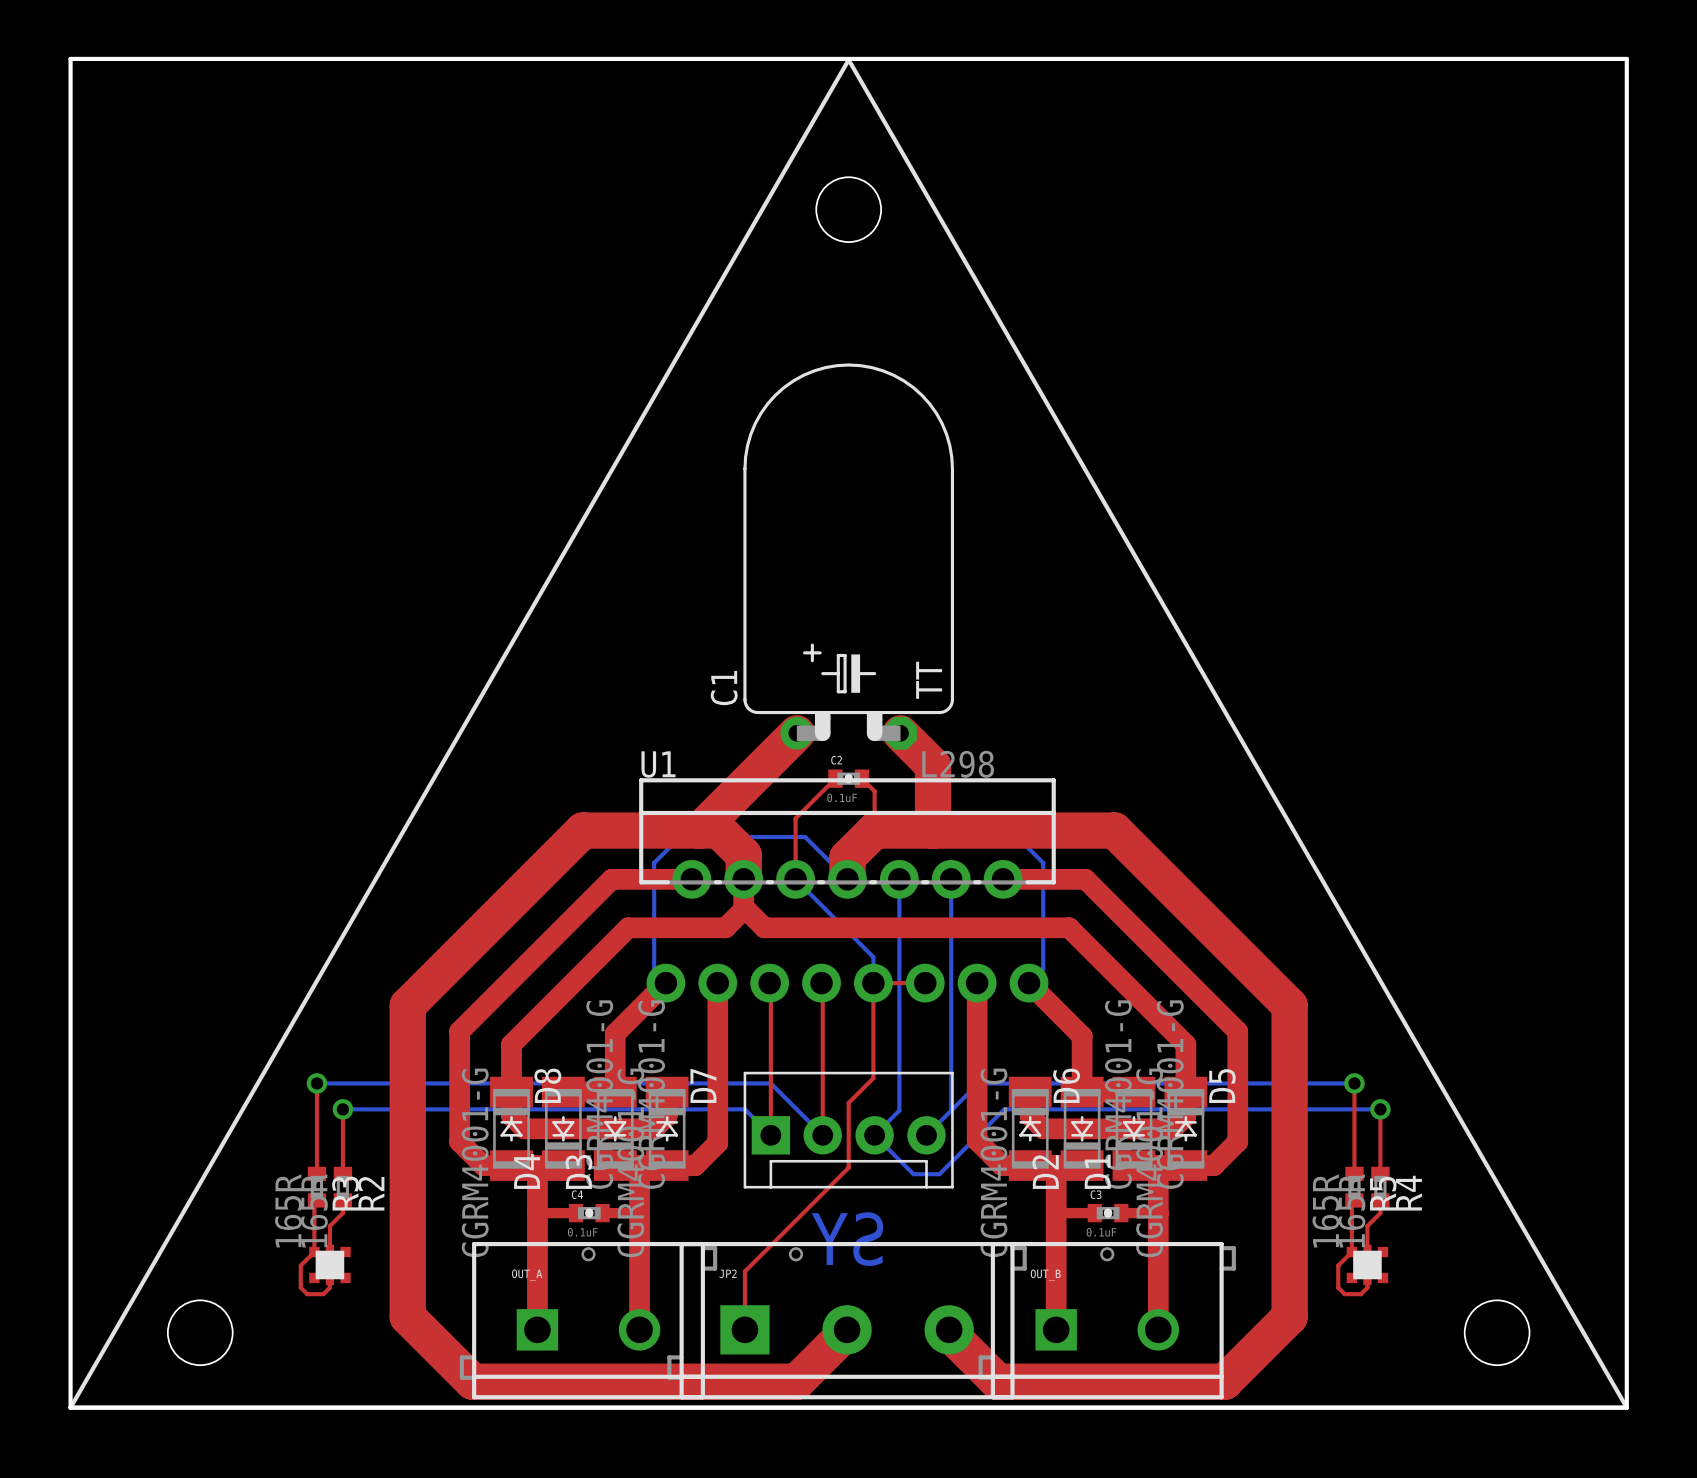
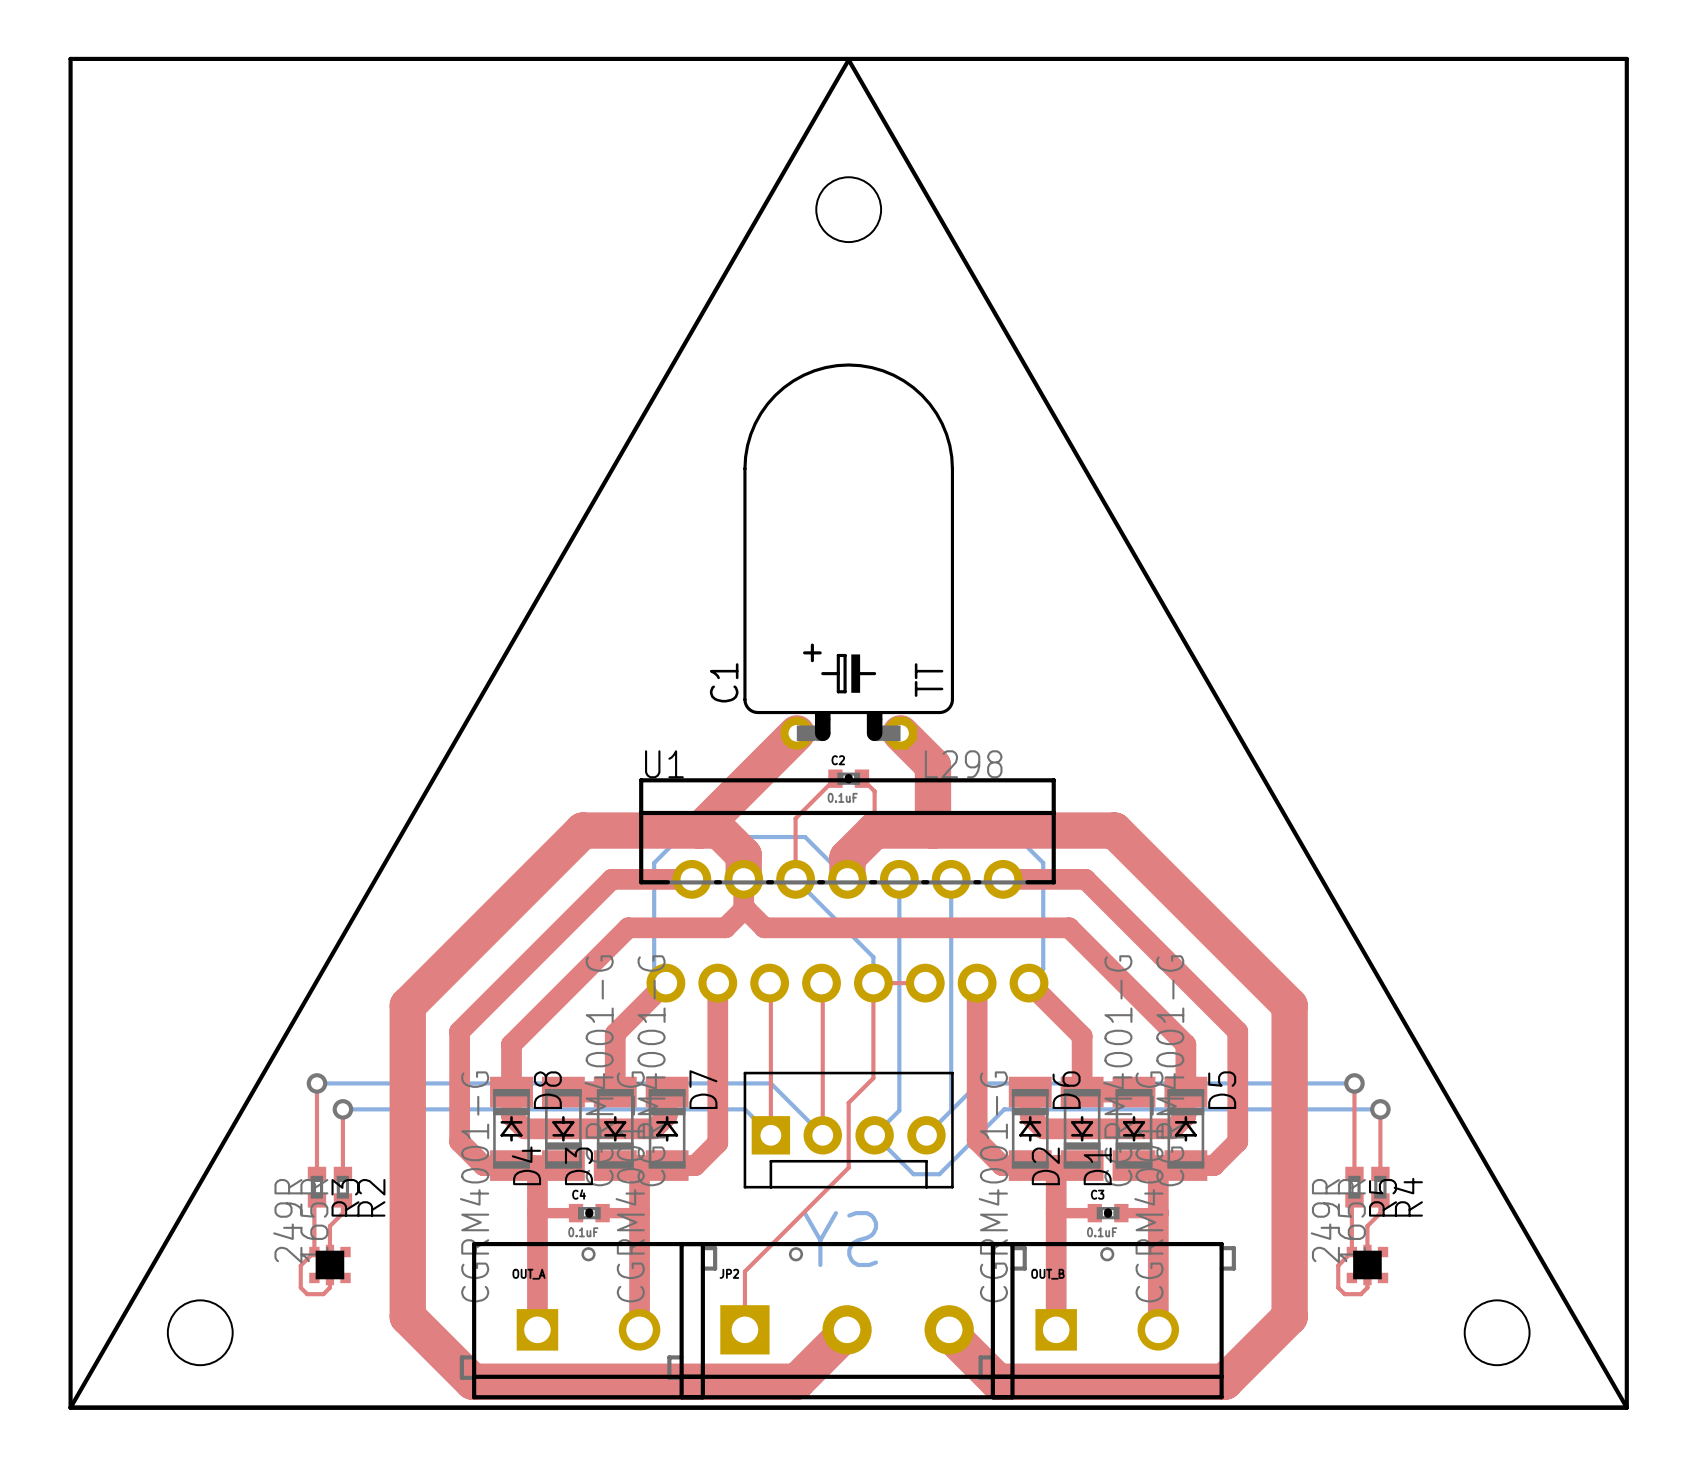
R3 value: 165R (288, 1210) -> 249R (287, 1221)
R5 value: 165R (1325, 1210) -> 249R (1325, 1221)

